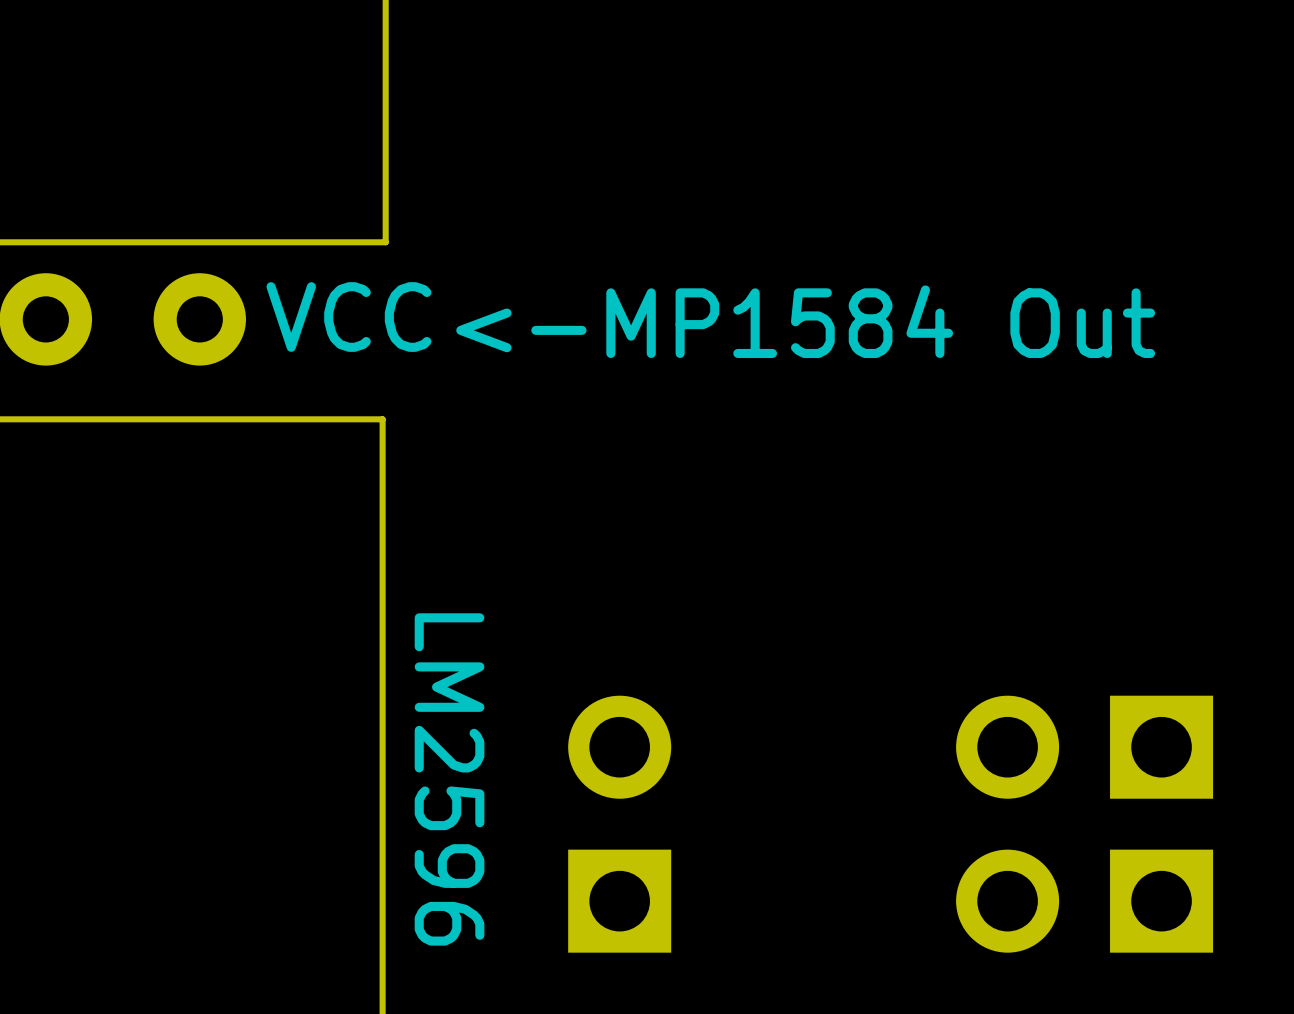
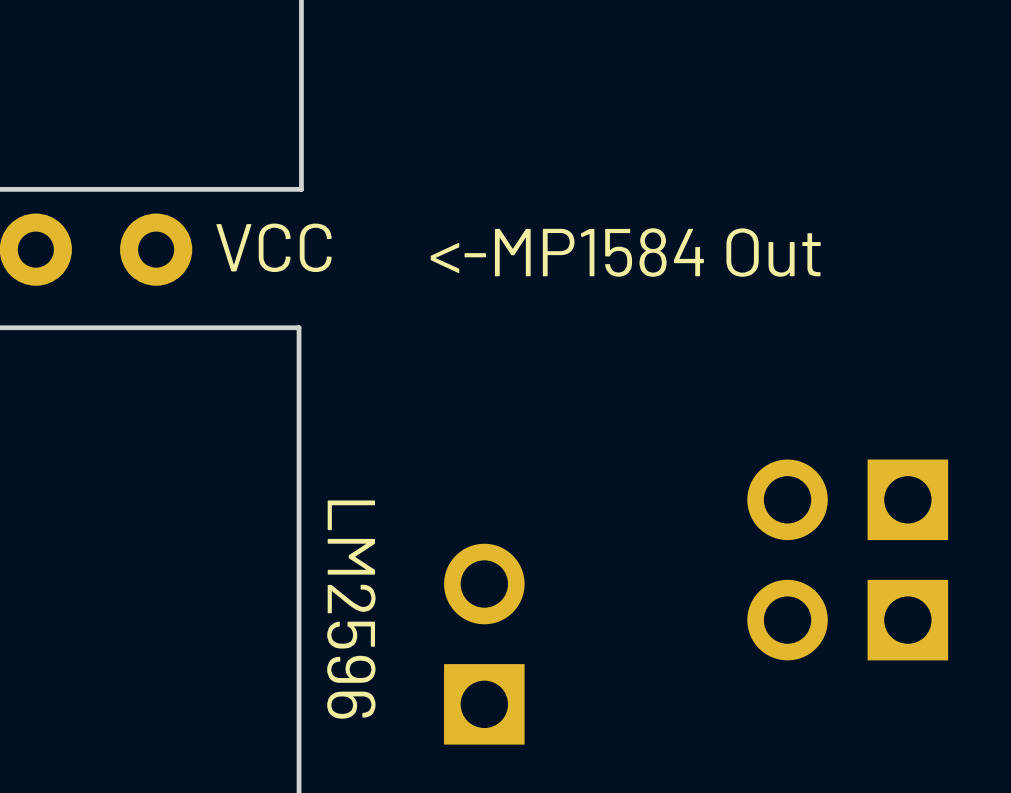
part position: (1084, 747) -> (847, 620)
part position: (1084, 901) -> (847, 499)

